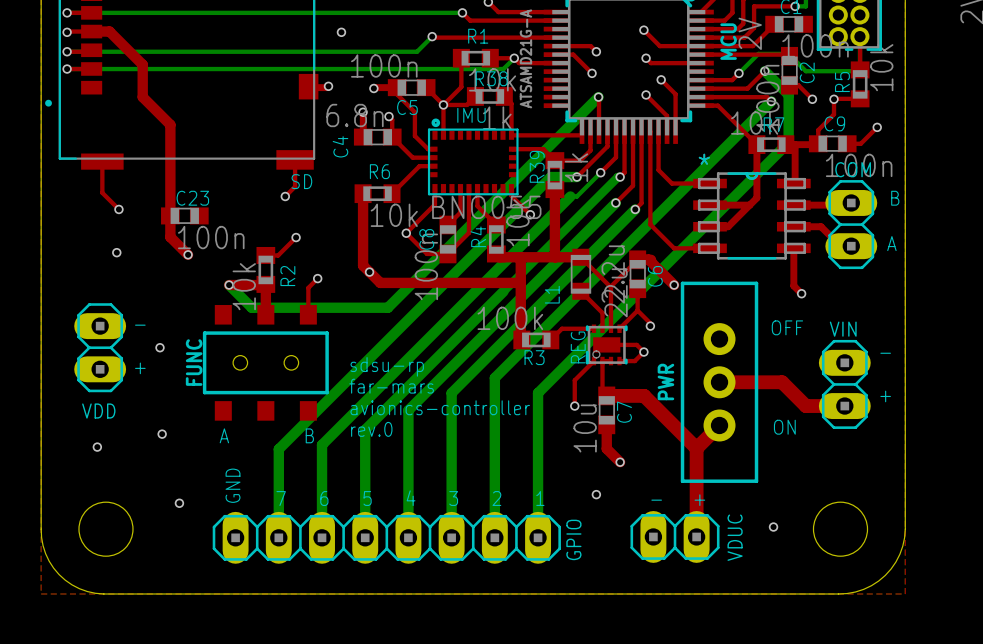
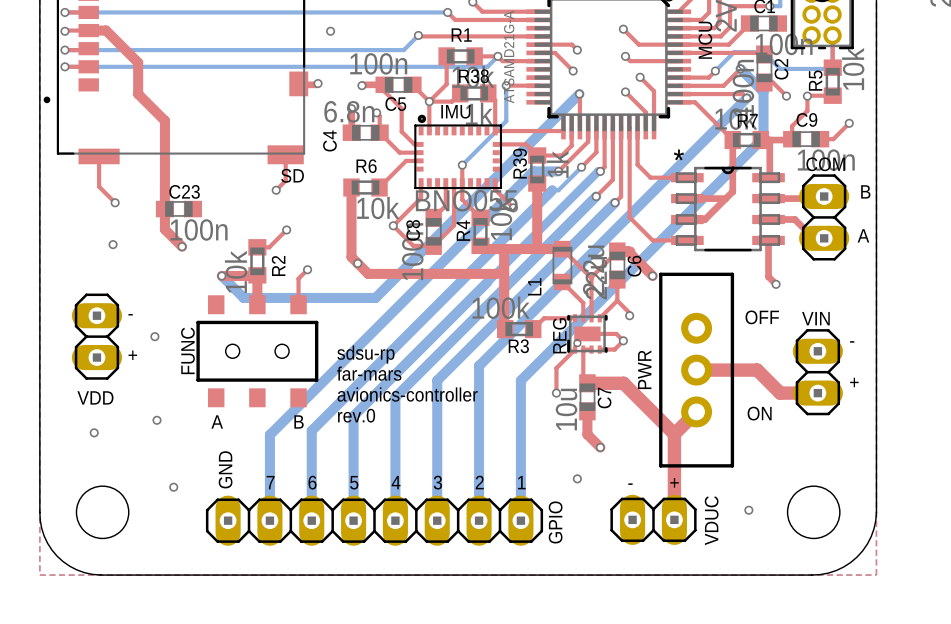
top track: none -> (506, 85) (538, 85)
bottom track: none -> (506, 85) (506, 121) (462, 165)
via: none -> (506, 85)
top track: none -> (462, 165) (462, 182)
via: none -> (462, 165)

